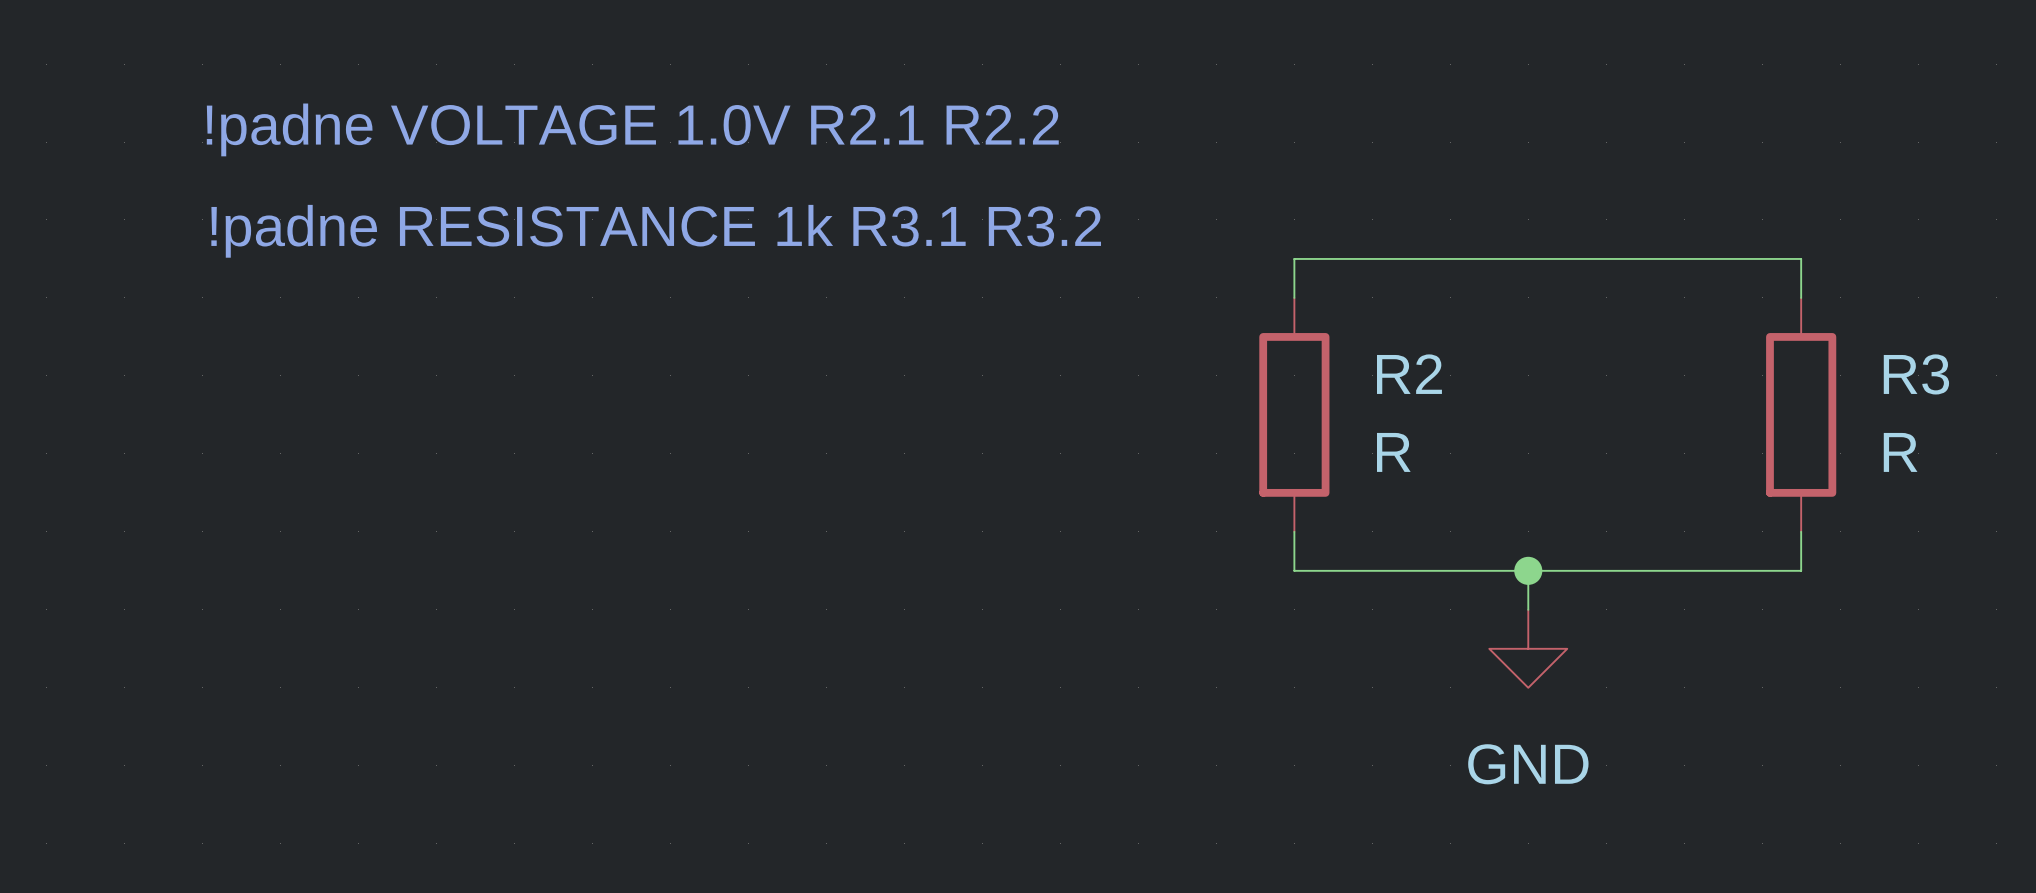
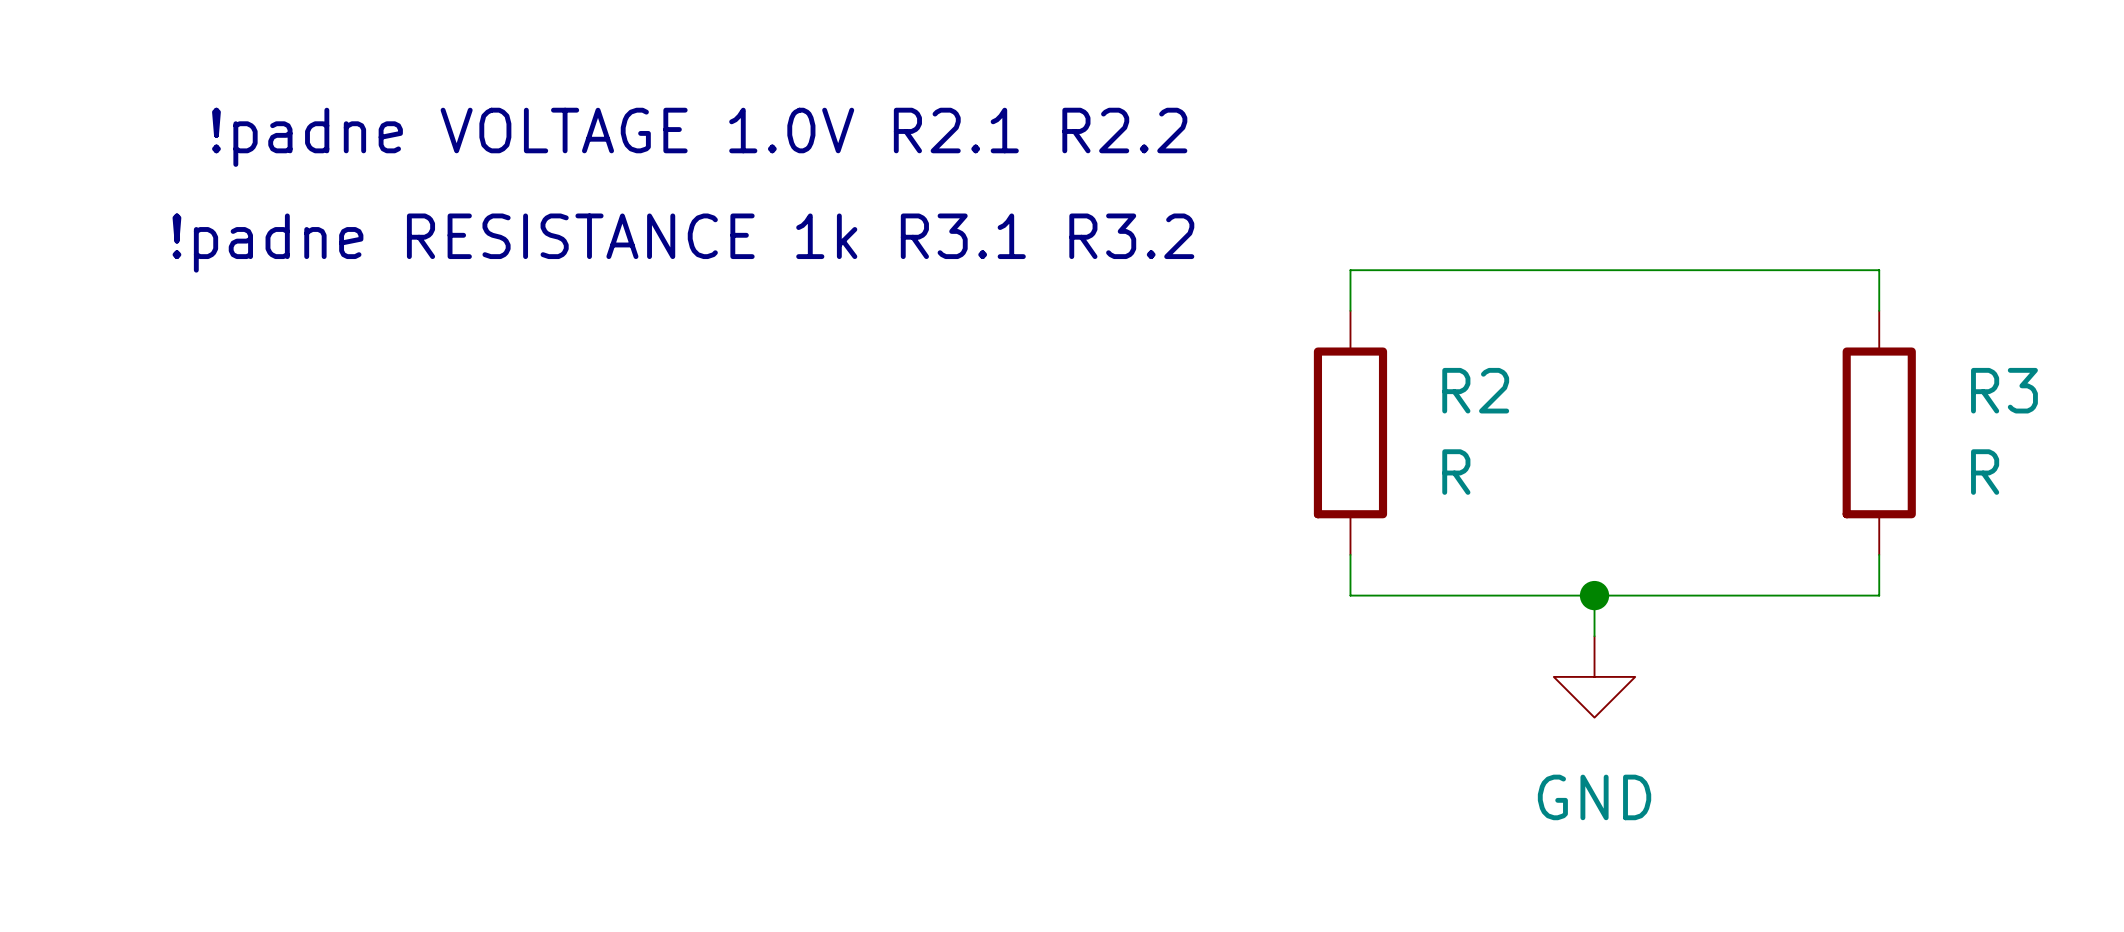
text position: !padne VOLTAGE 1.0V R2.1 R2.2 (632, 129) -> !padne VOLTAGE 1.0V R2.1 R2.2 (699, 137)

